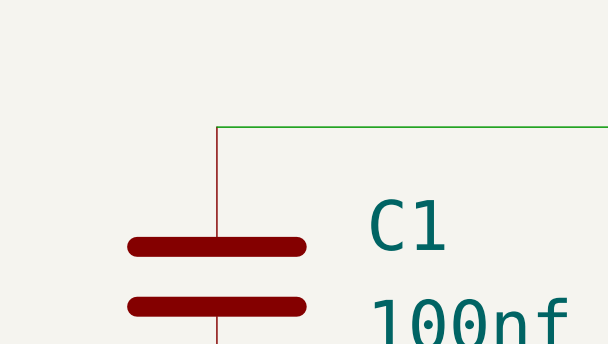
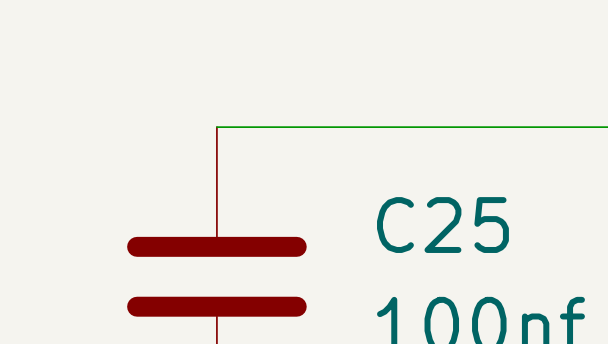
C1 name: C1 (407, 225) -> C25 (442, 225)

